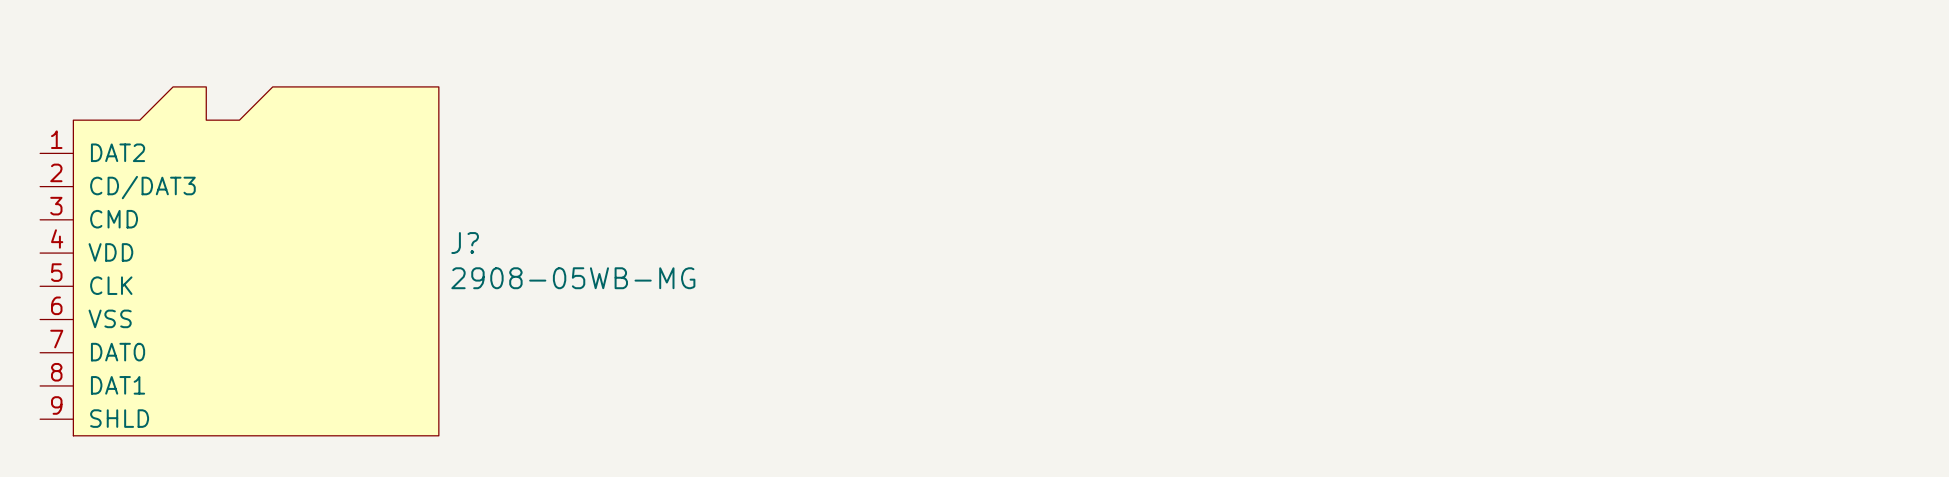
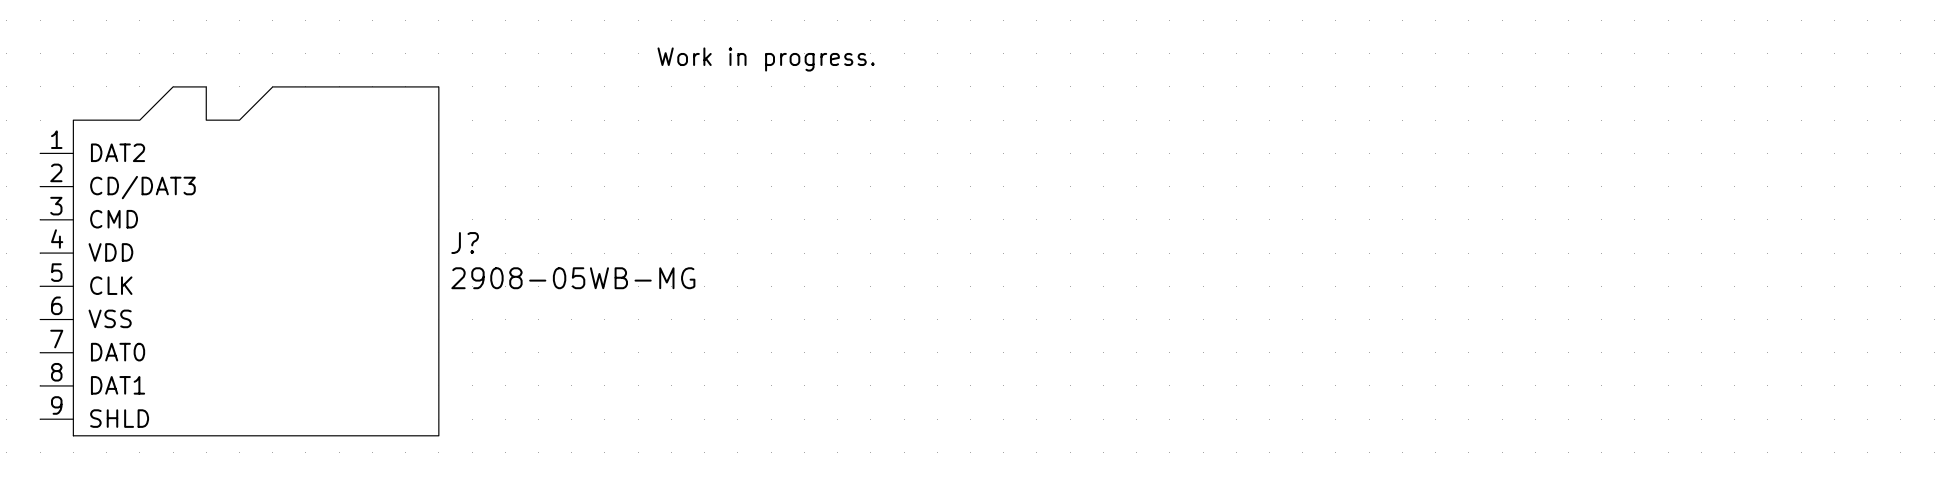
text: none -> Work in progress. (766, 59)

